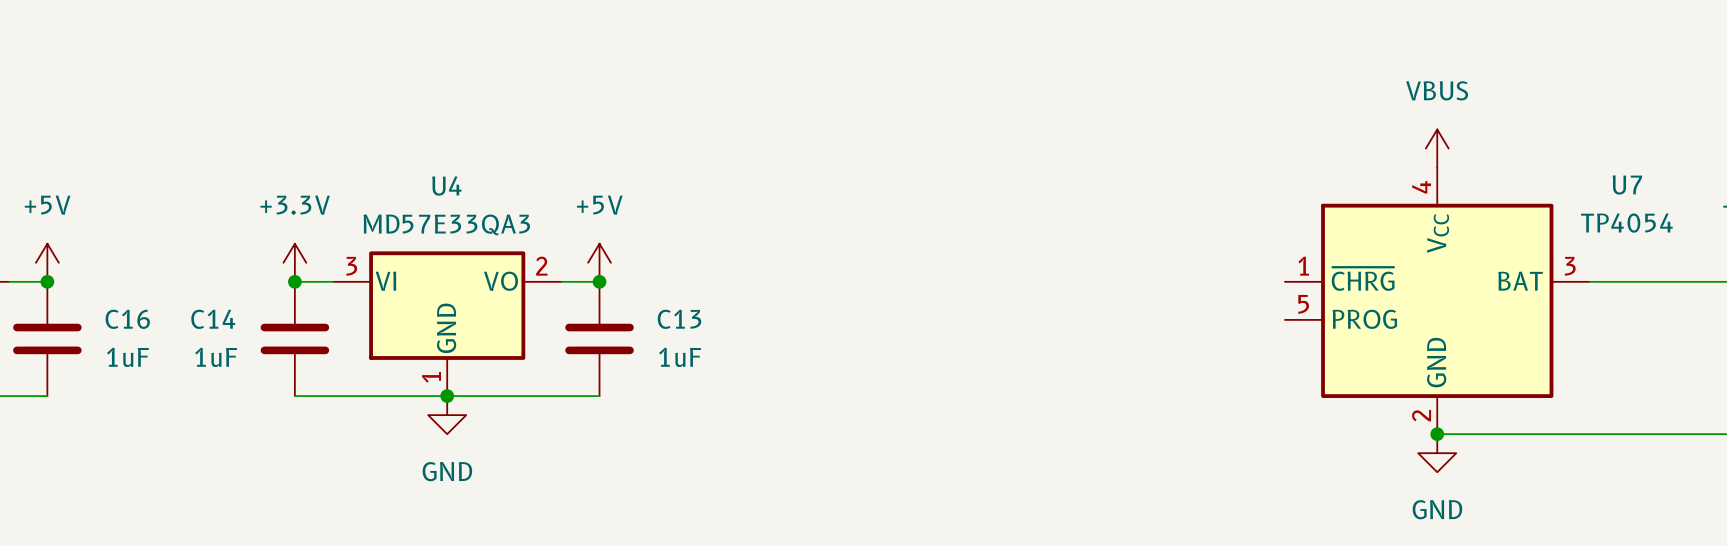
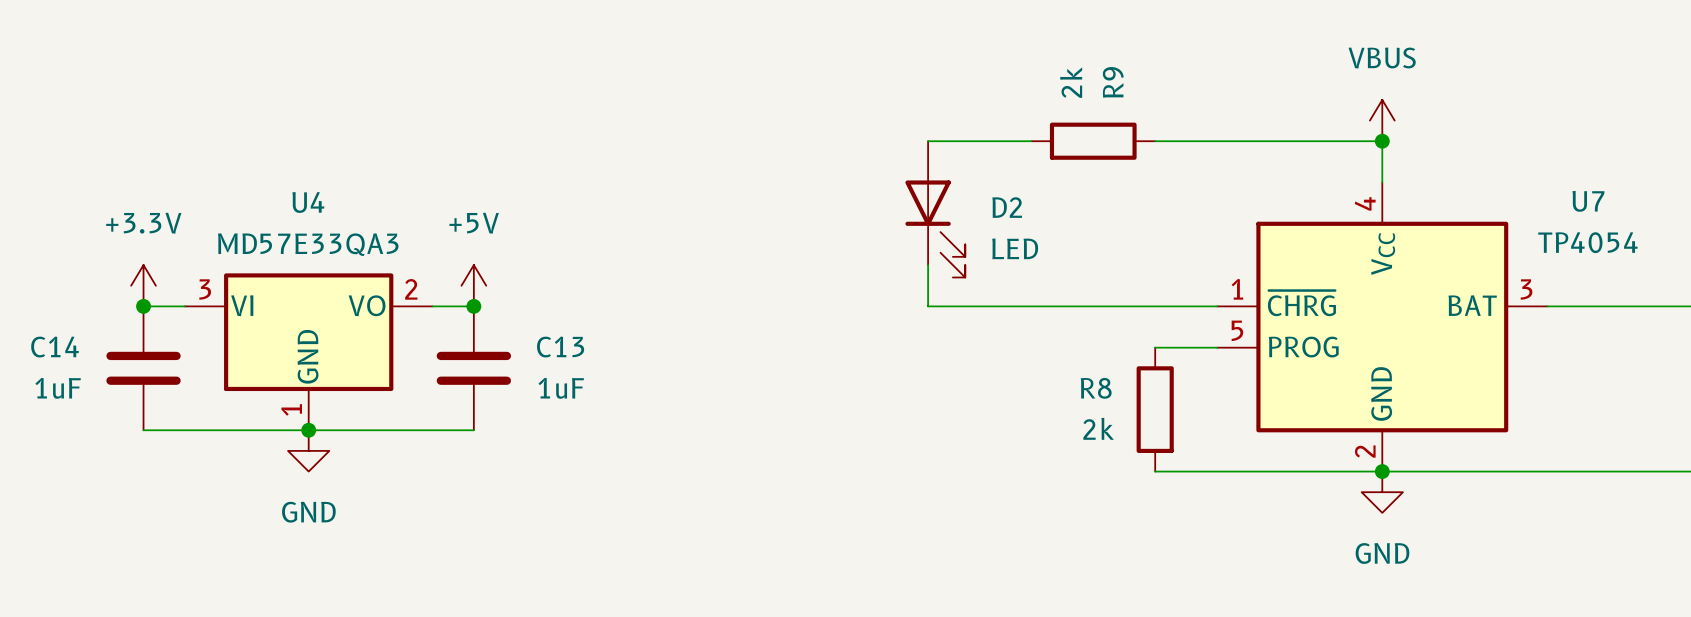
wire: none -> (928, 141) (1031, 141)
R9: none -> 2k (1093, 141)
wire: none -> (1155, 141) (1382, 141) (1382, 182)
junction: none -> (1382, 141)
power symbol position: VBUS (1437, 148) -> VBUS (1382, 120)
D2: none -> LED (935, 209)
wire: none -> (928, 265) (928, 306) (1217, 306)
wire: none -> (1155, 347) (1217, 347)
R8: none -> 2k (1155, 409)
wire: none -> (1155, 471) (1382, 471)

